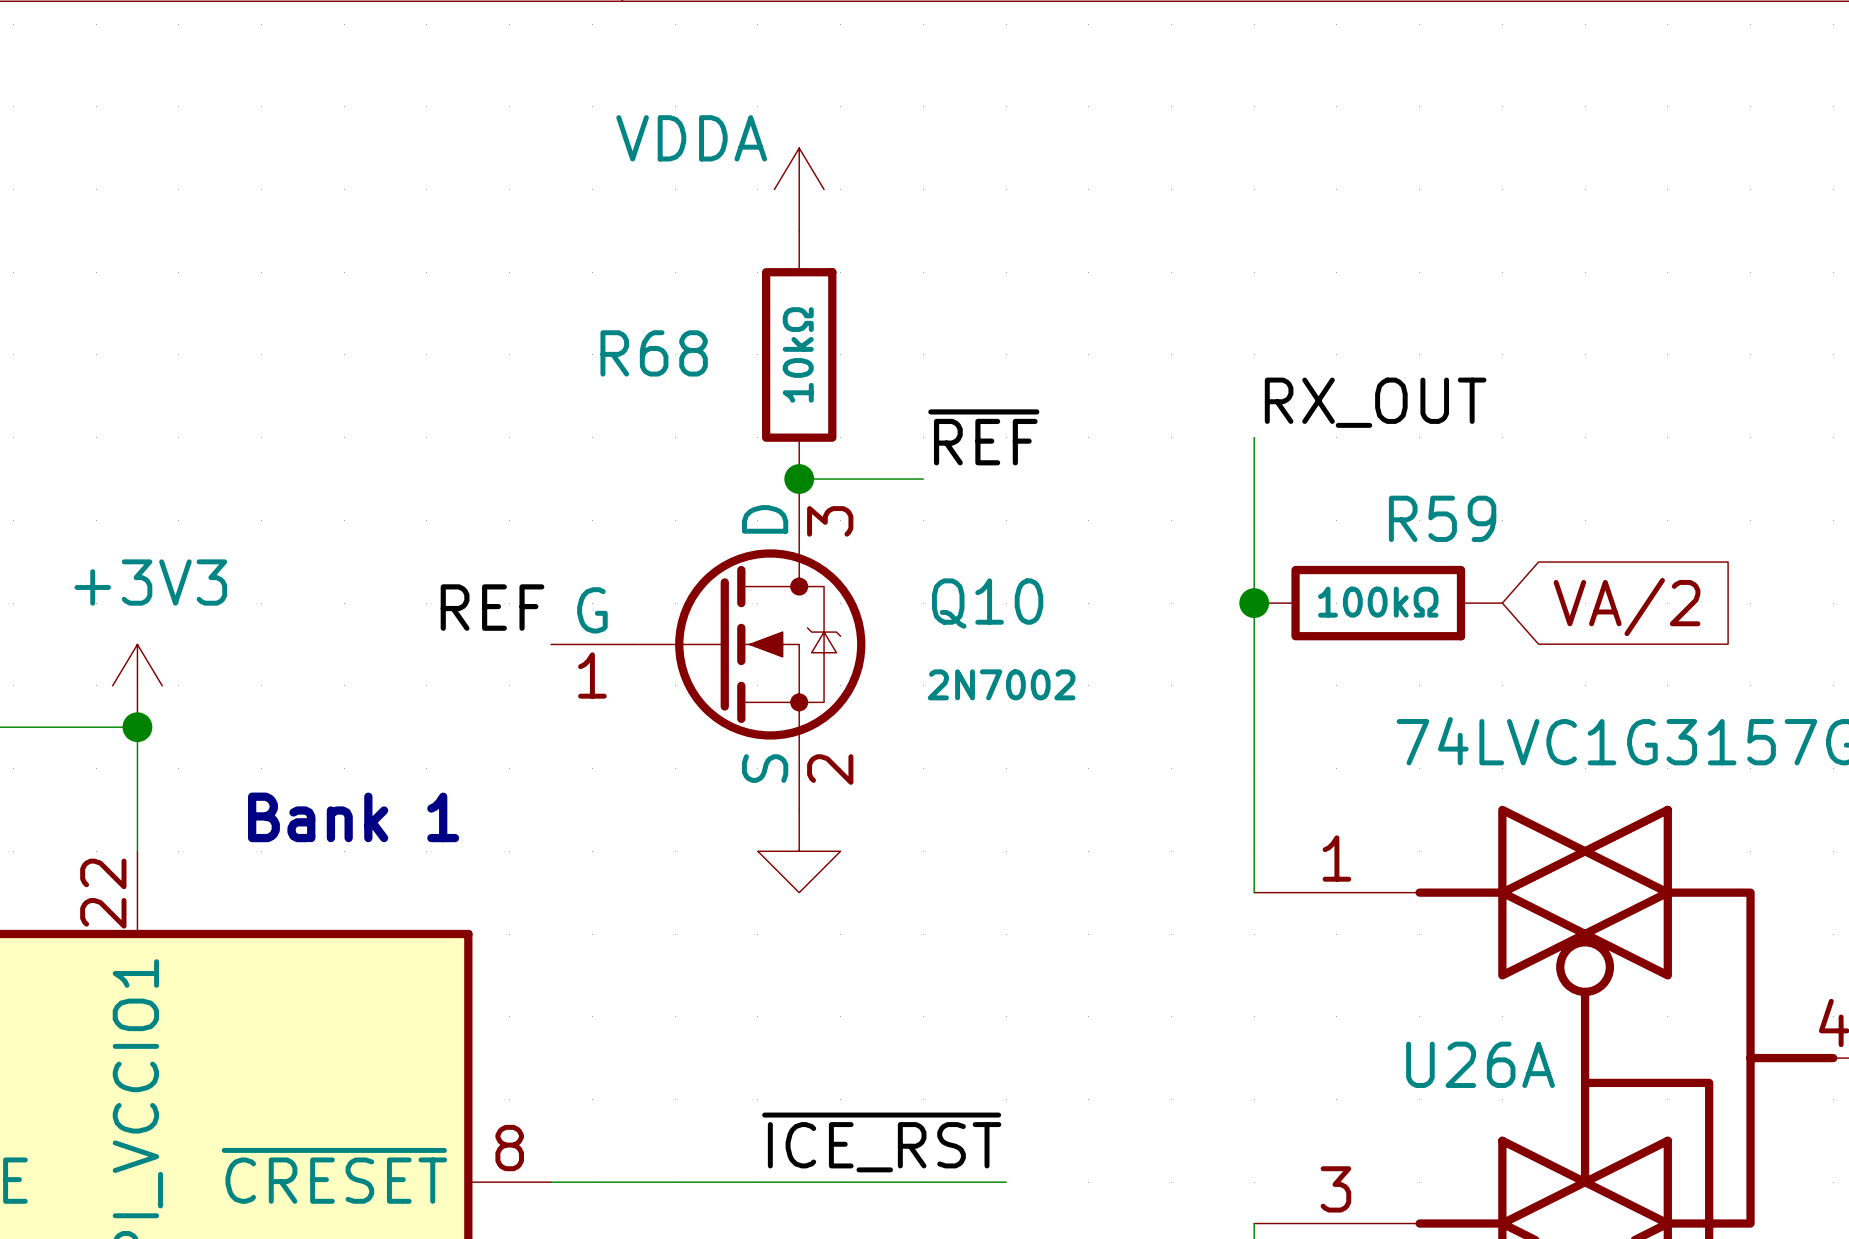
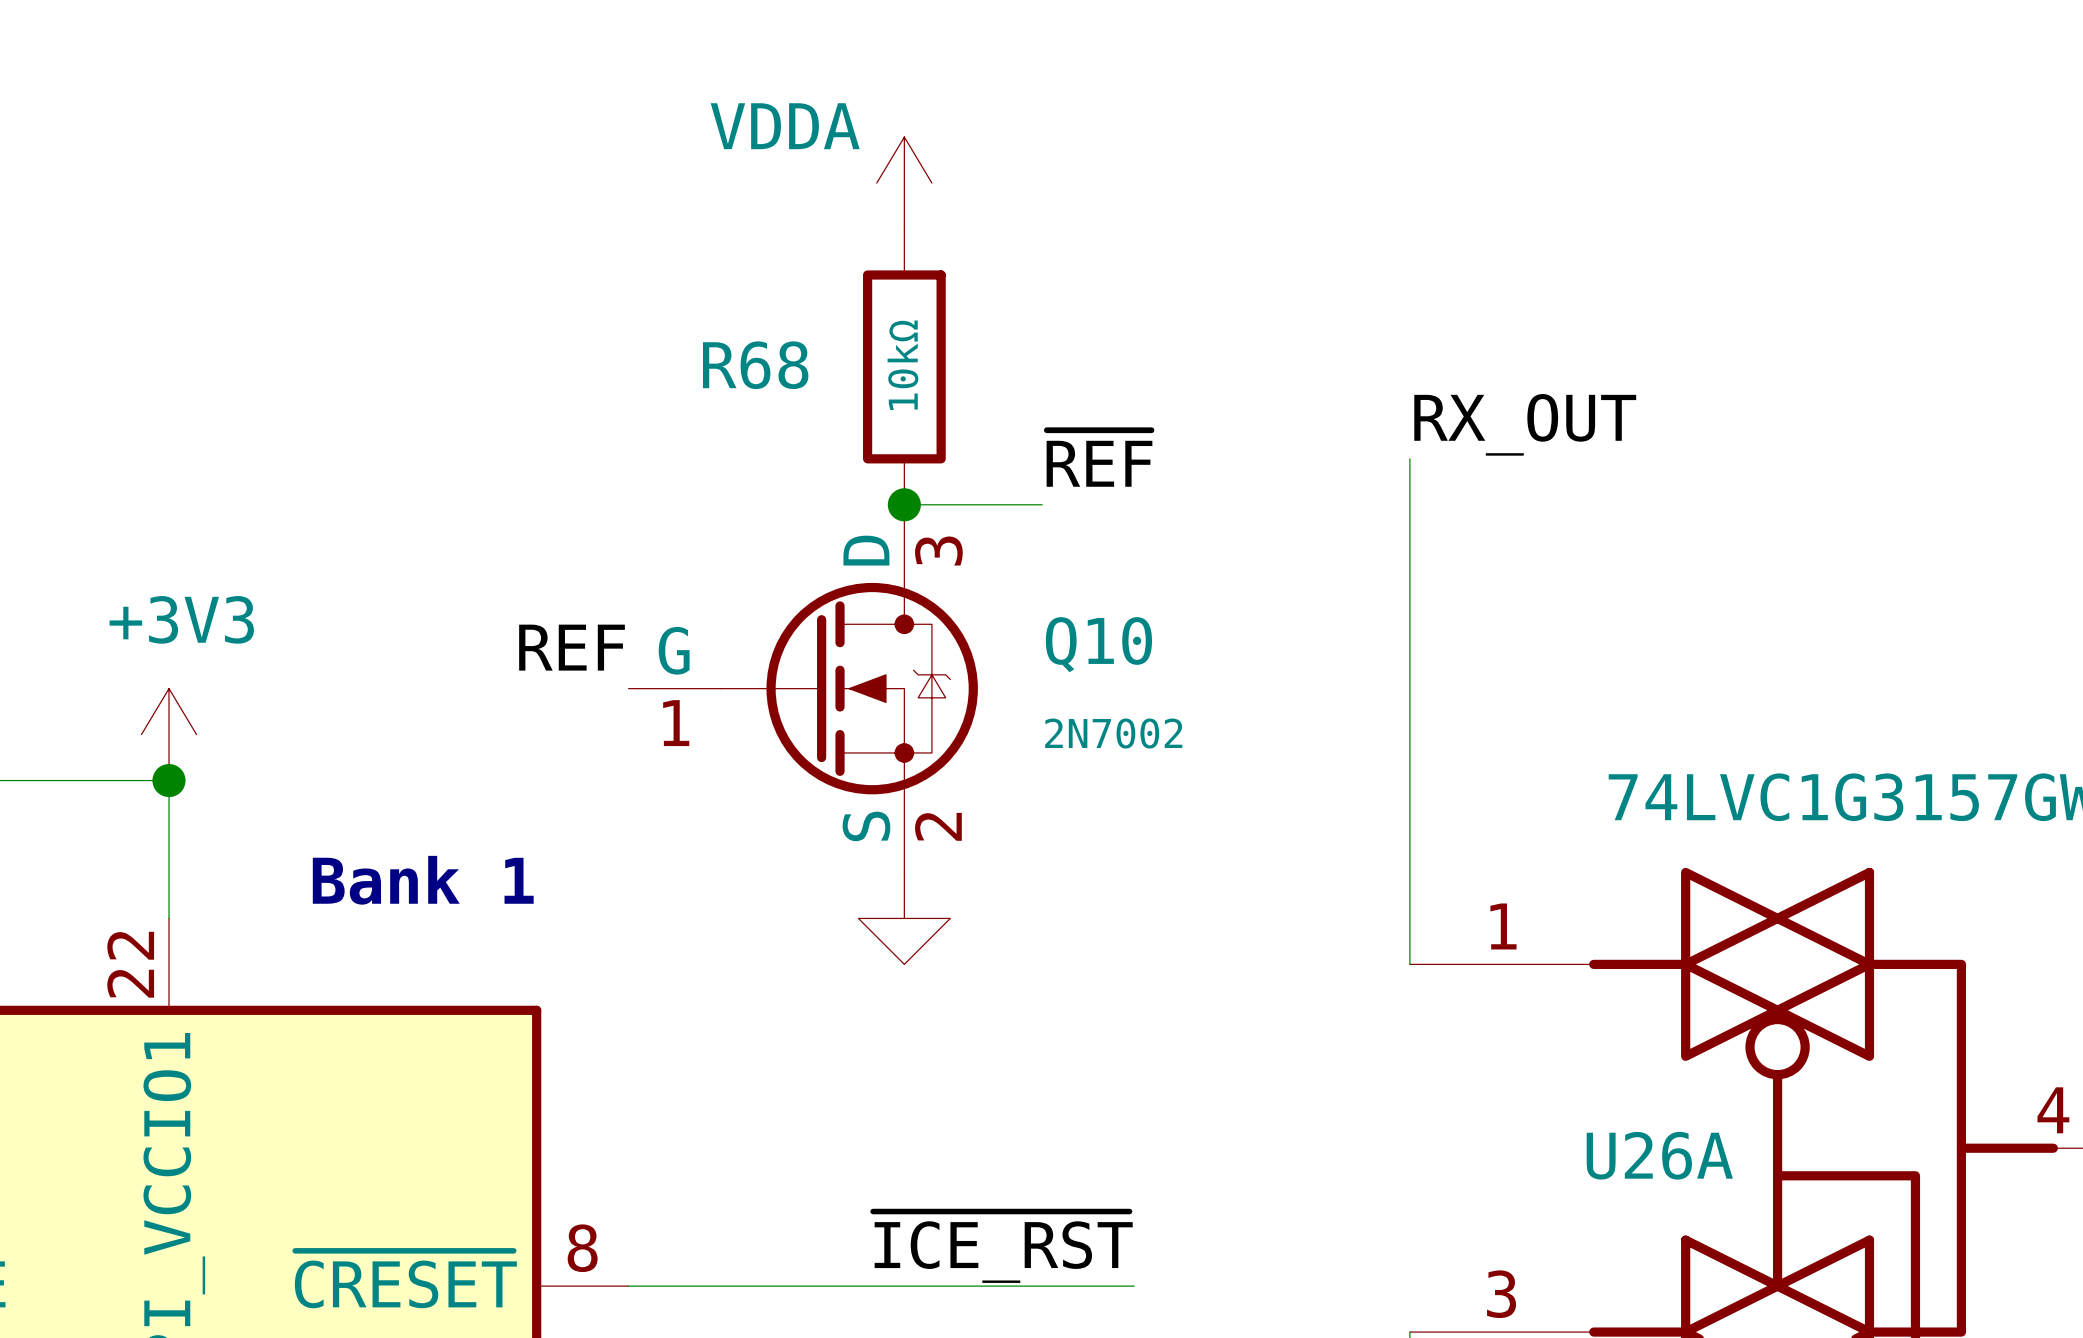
junction: (1254, 603) -> none
R59: 100kΩ (1378, 603) -> none
global label: VA/2 (1627, 607) -> none

